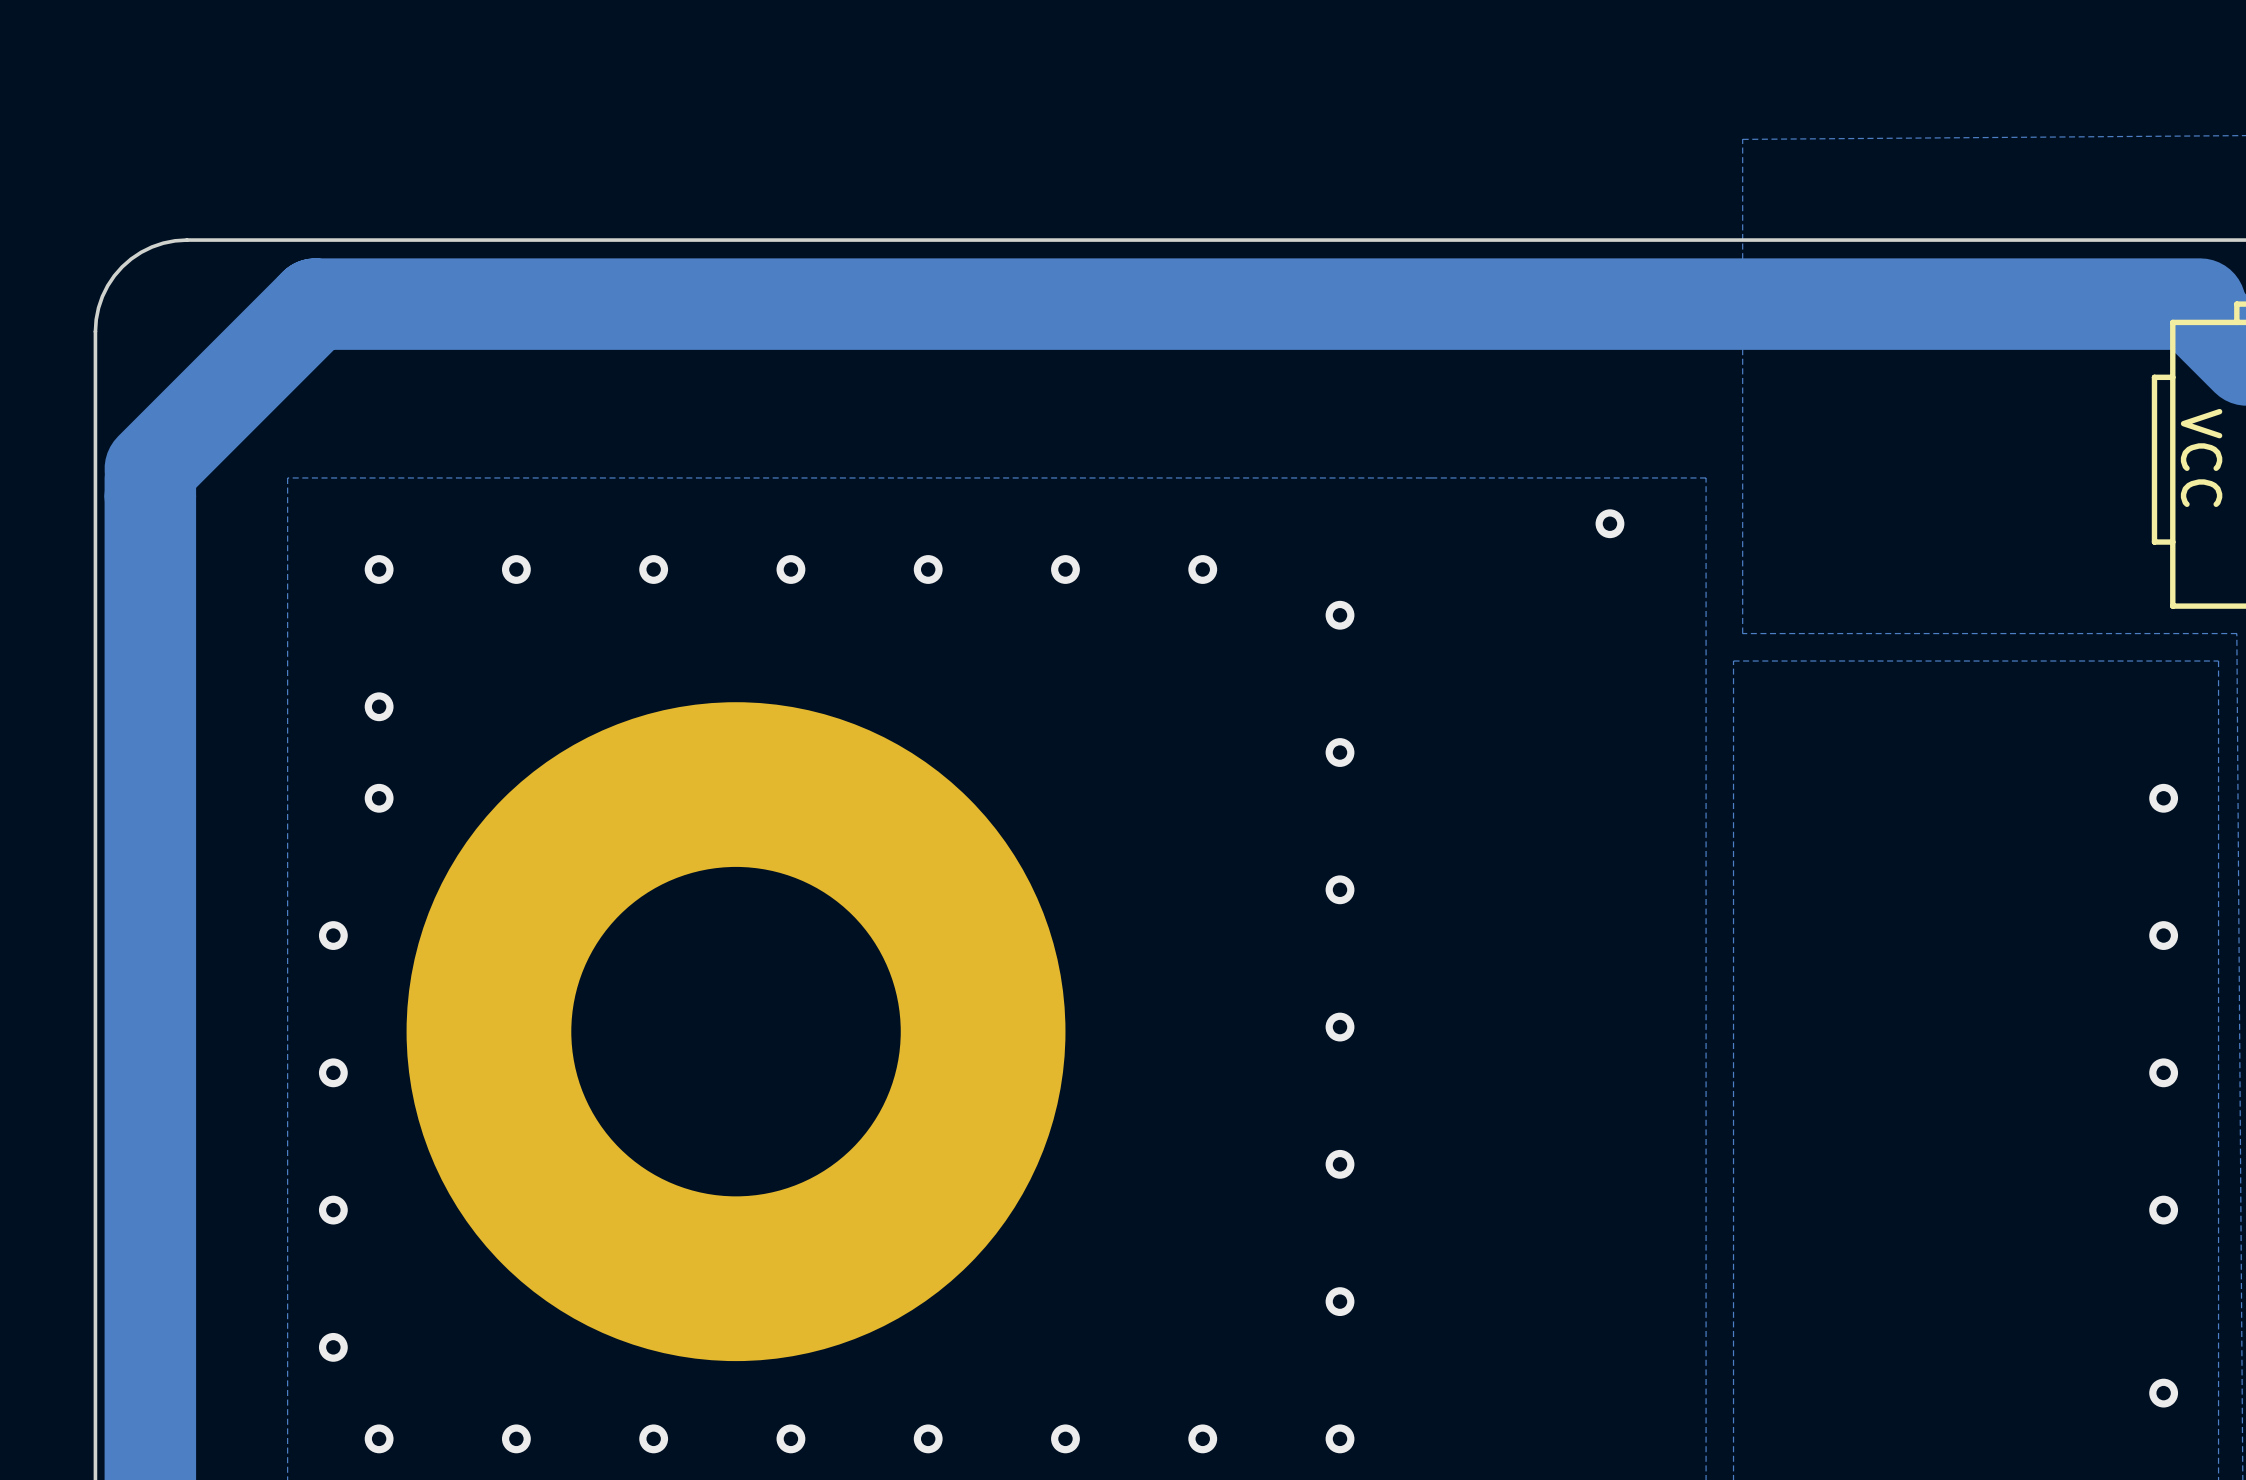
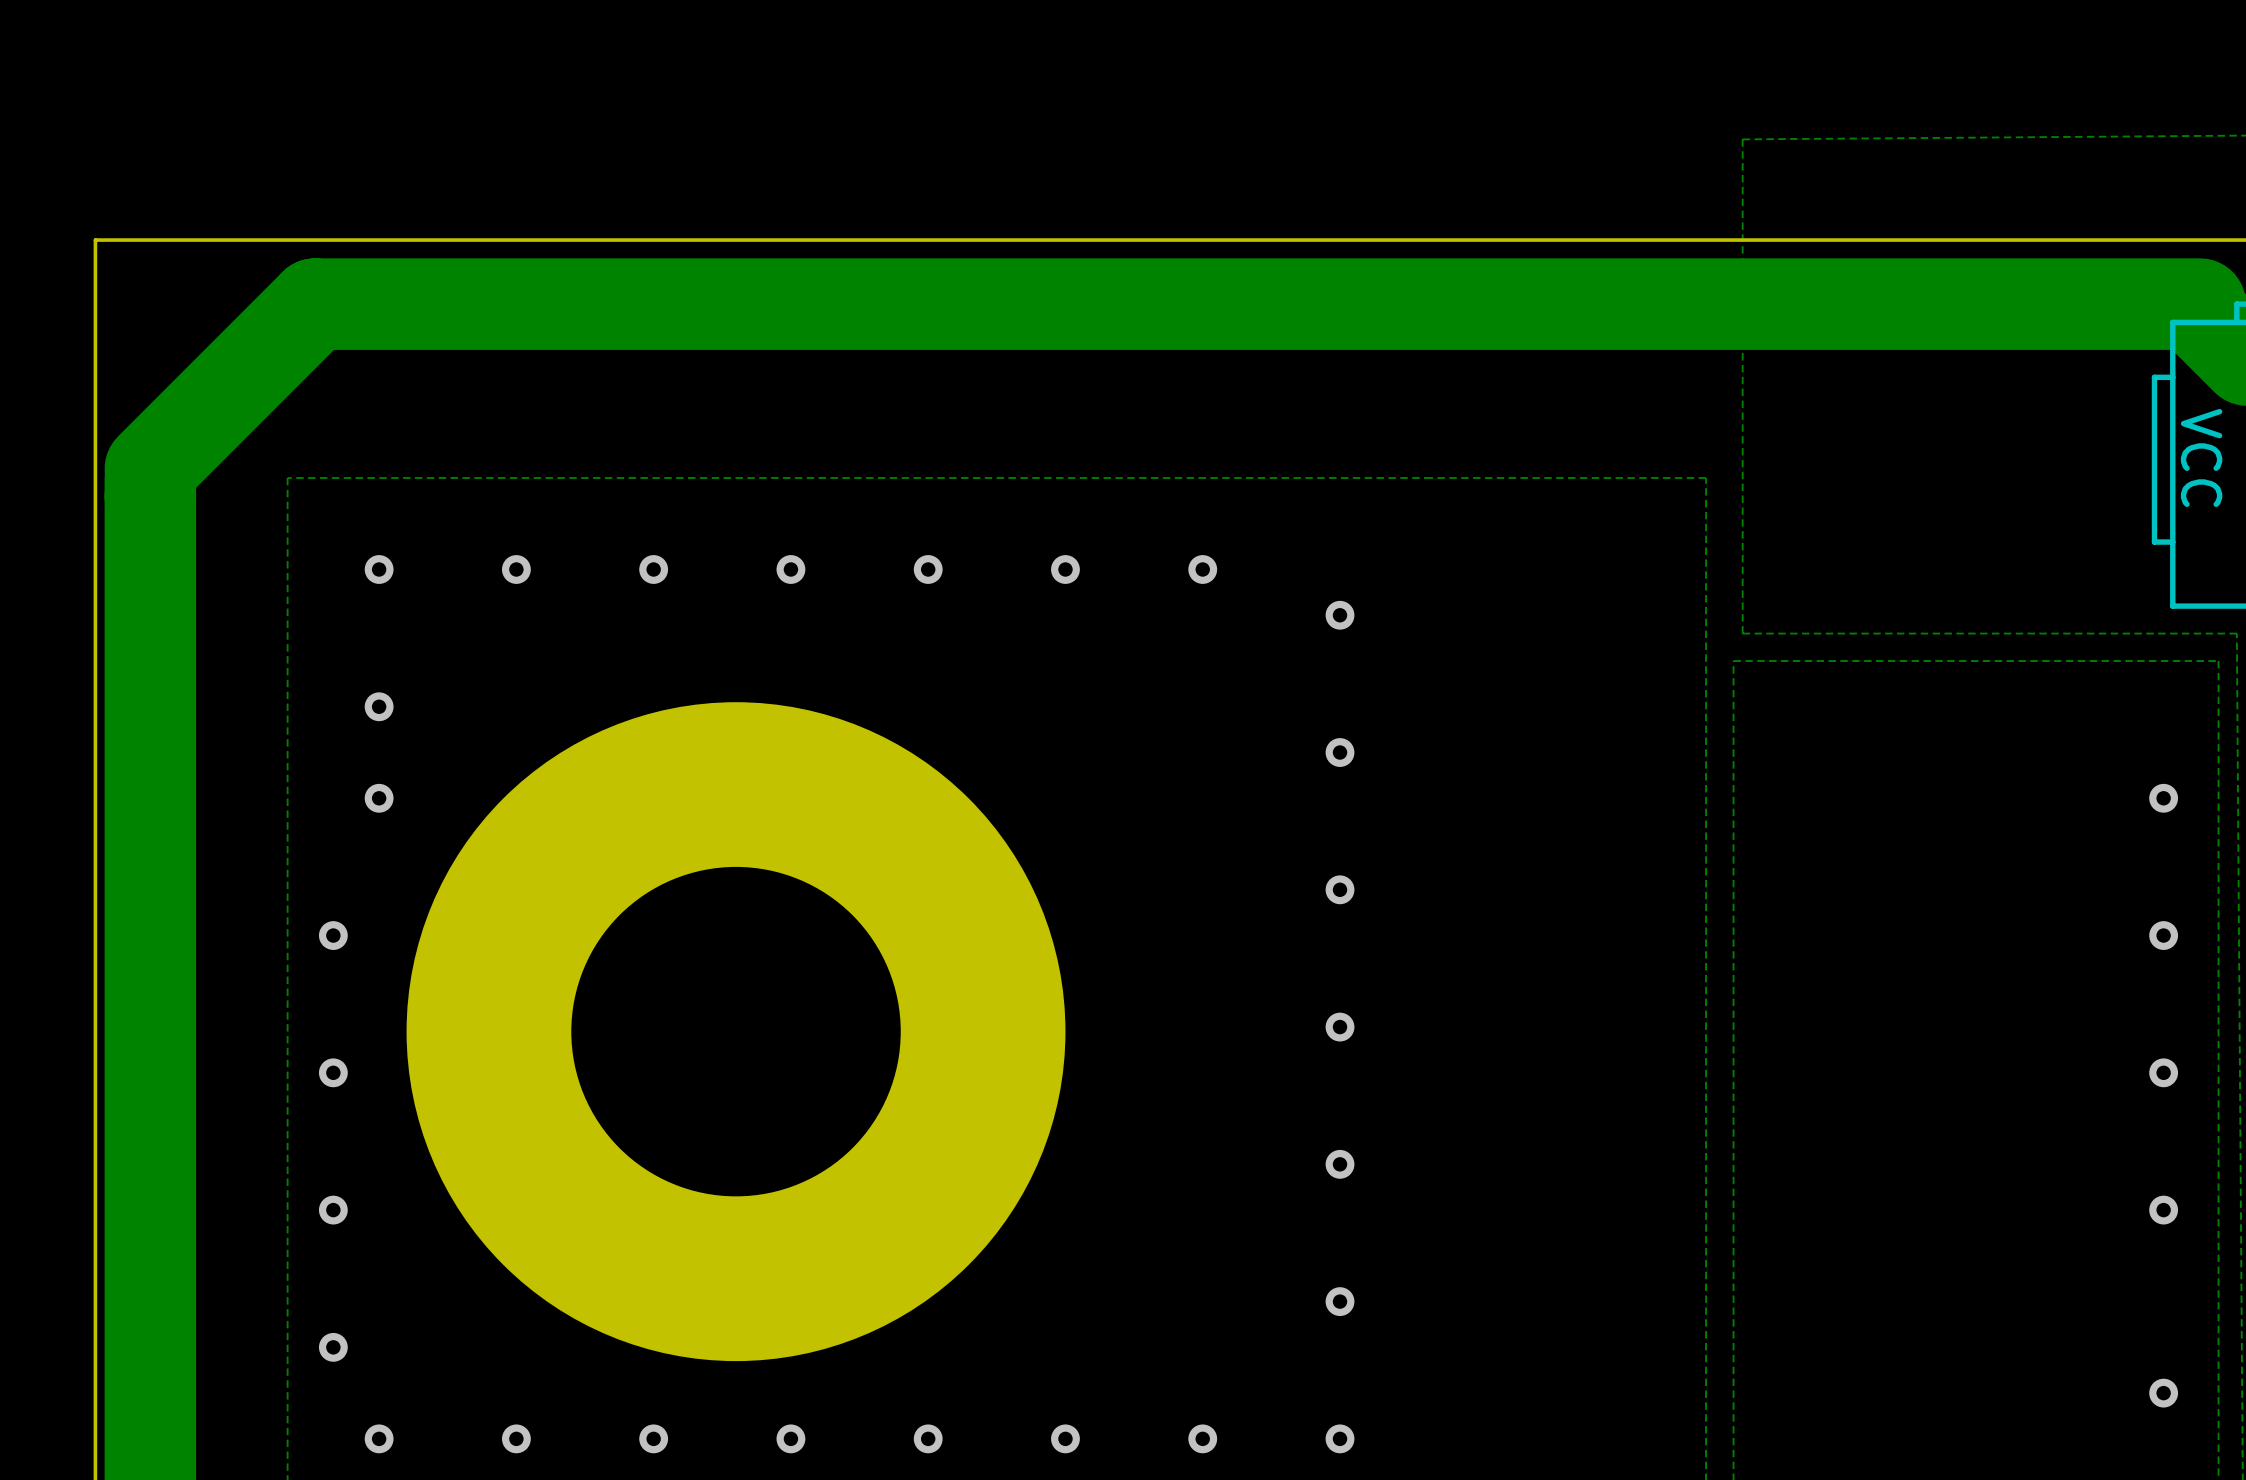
board edge: (186, 240) (163, 243) (151, 247) (141, 252) (122, 266) (107, 285) (102, 296) (96, 319) (95, 331) -> (186, 240) (95, 240) (95, 331)
via: (1609, 523) -> none

